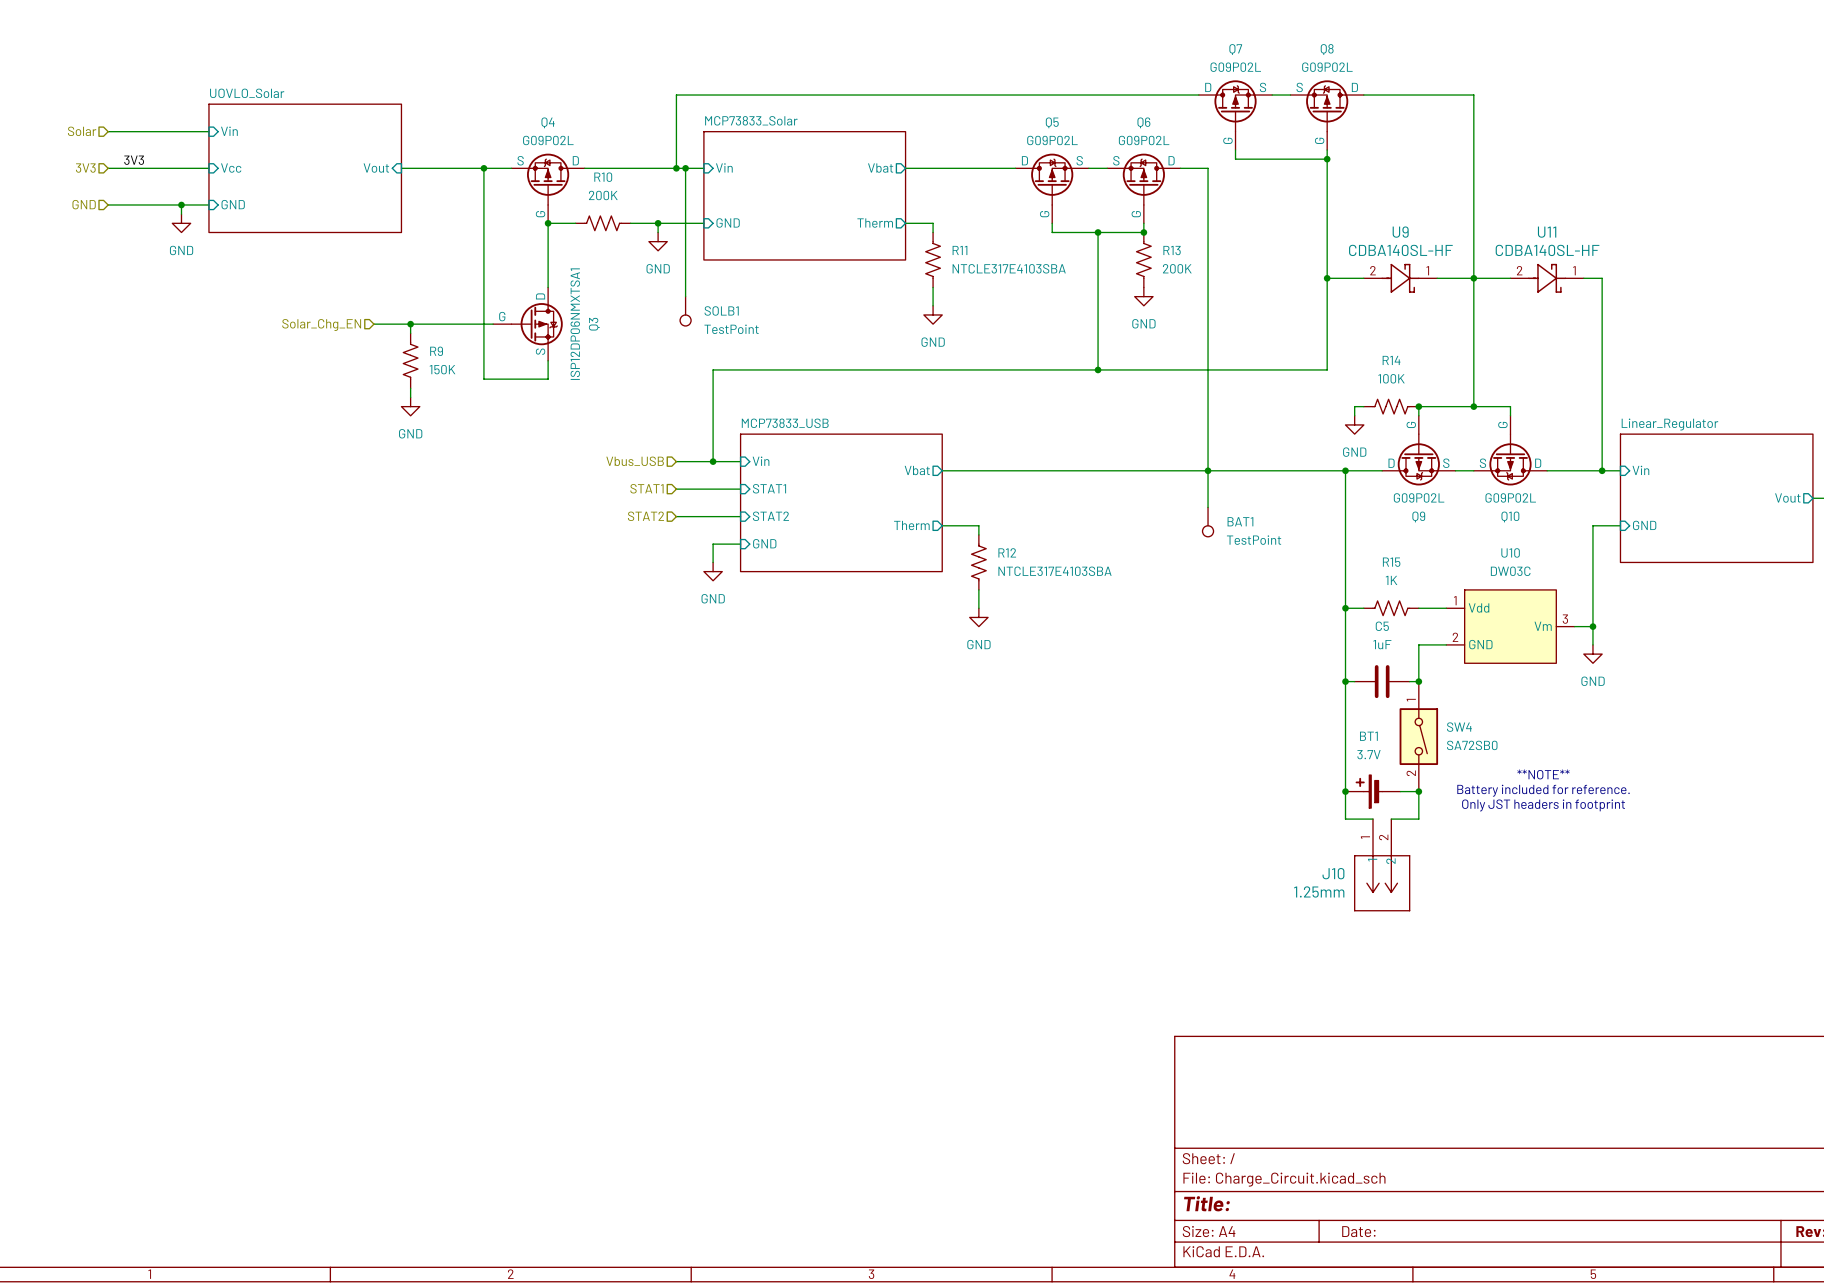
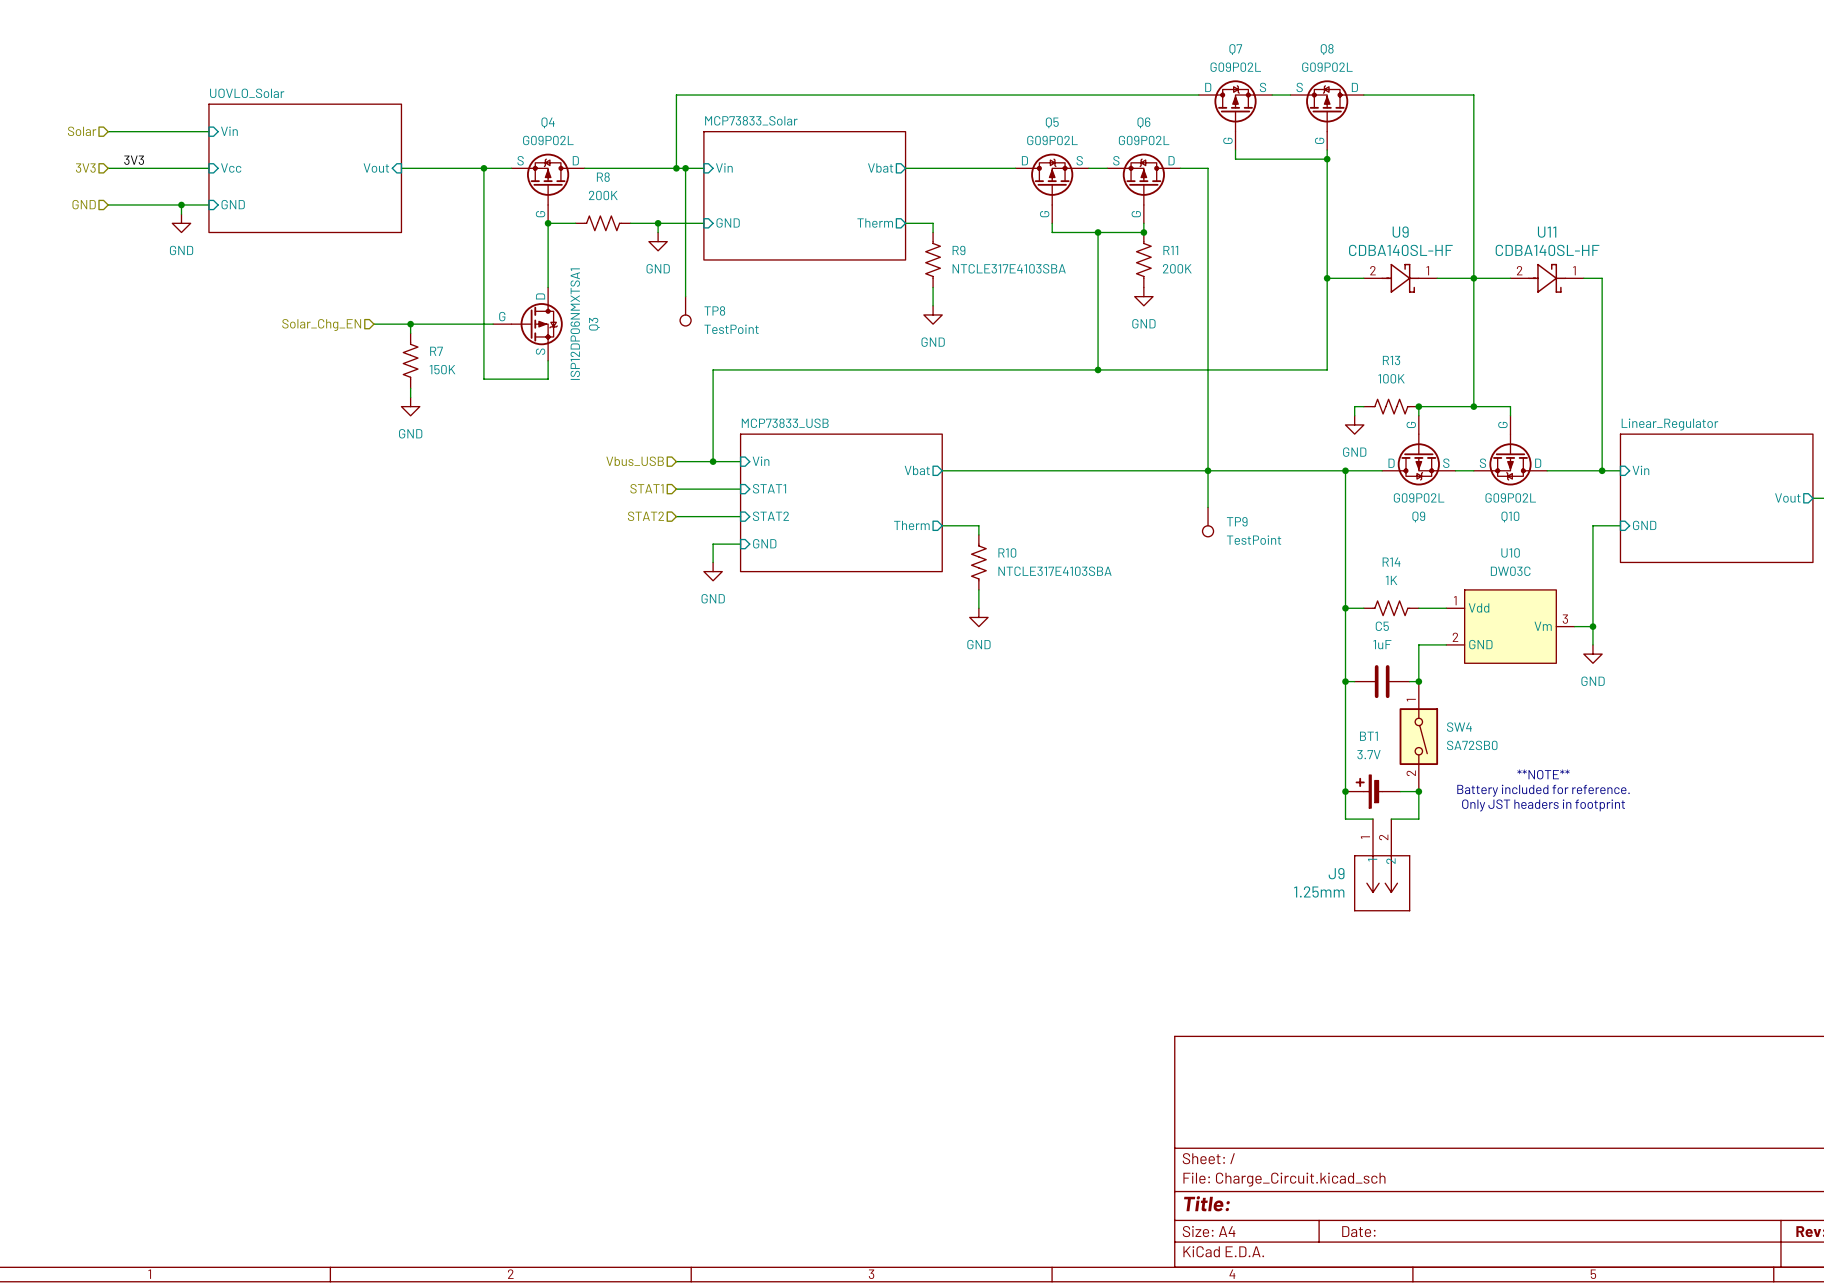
R10 name: R10 (603, 177) -> R8 (603, 177)
R11 name: R11 (959, 250) -> R9 (958, 250)
R13 name: R13 (1172, 250) -> R11 (1170, 250)
SOLB1 name: SOLB1 (721, 310) -> TP8 (714, 310)
R9 name: R9 (436, 351) -> R7 (436, 351)
R14 name: R14 (1391, 360) -> R13 (1391, 360)
BAT1 name: BAT1 (1240, 521) -> TP9 (1237, 521)
R12 name: R12 (1007, 552) -> R10 (1007, 552)
R15 name: R15 (1391, 562) -> R14 (1391, 562)
J10 name: J10 (1333, 873) -> J9 (1336, 873)

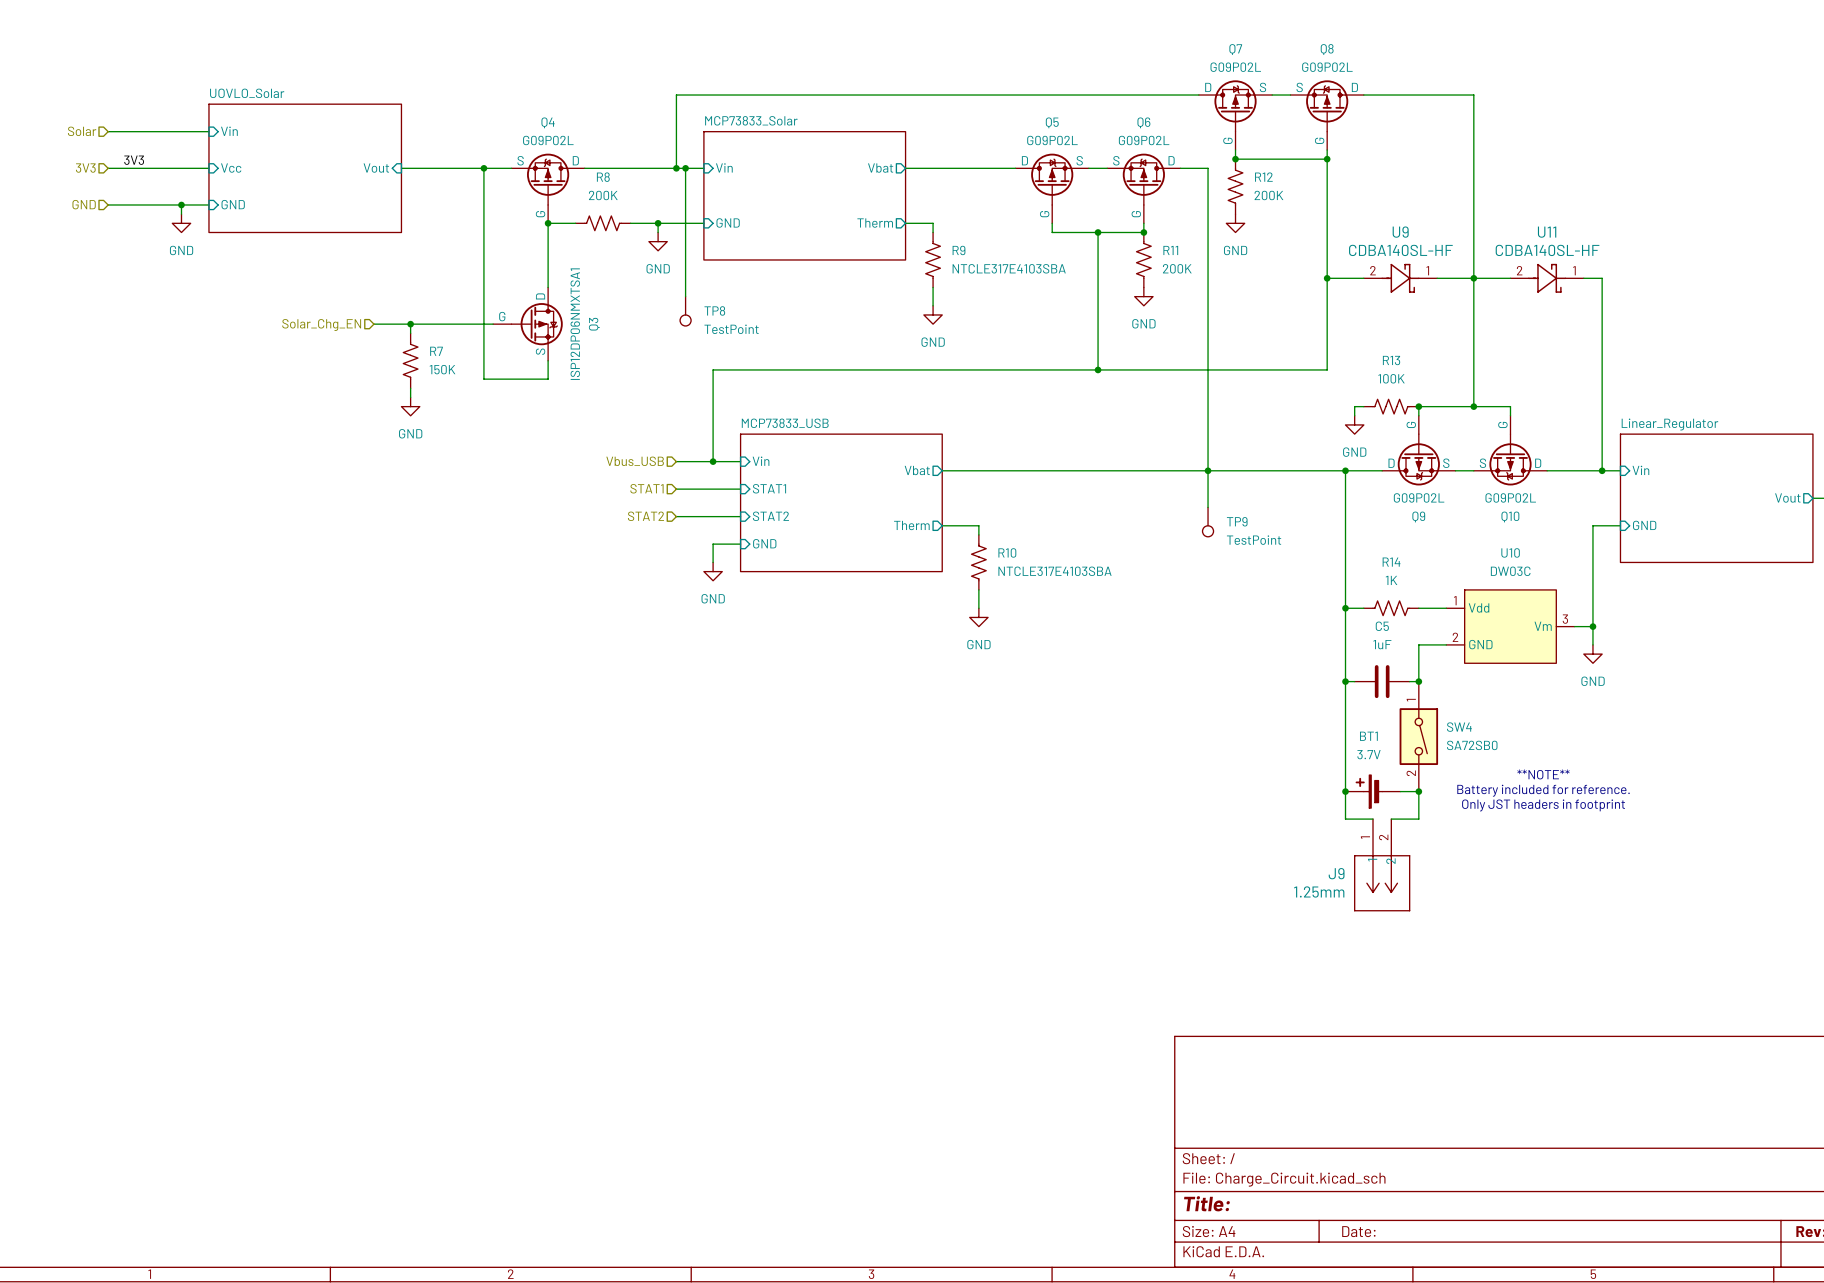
junction: none -> (1235, 159)
R12: none -> 200K (1235, 186)
power symbol: none -> GND (1235, 223)

